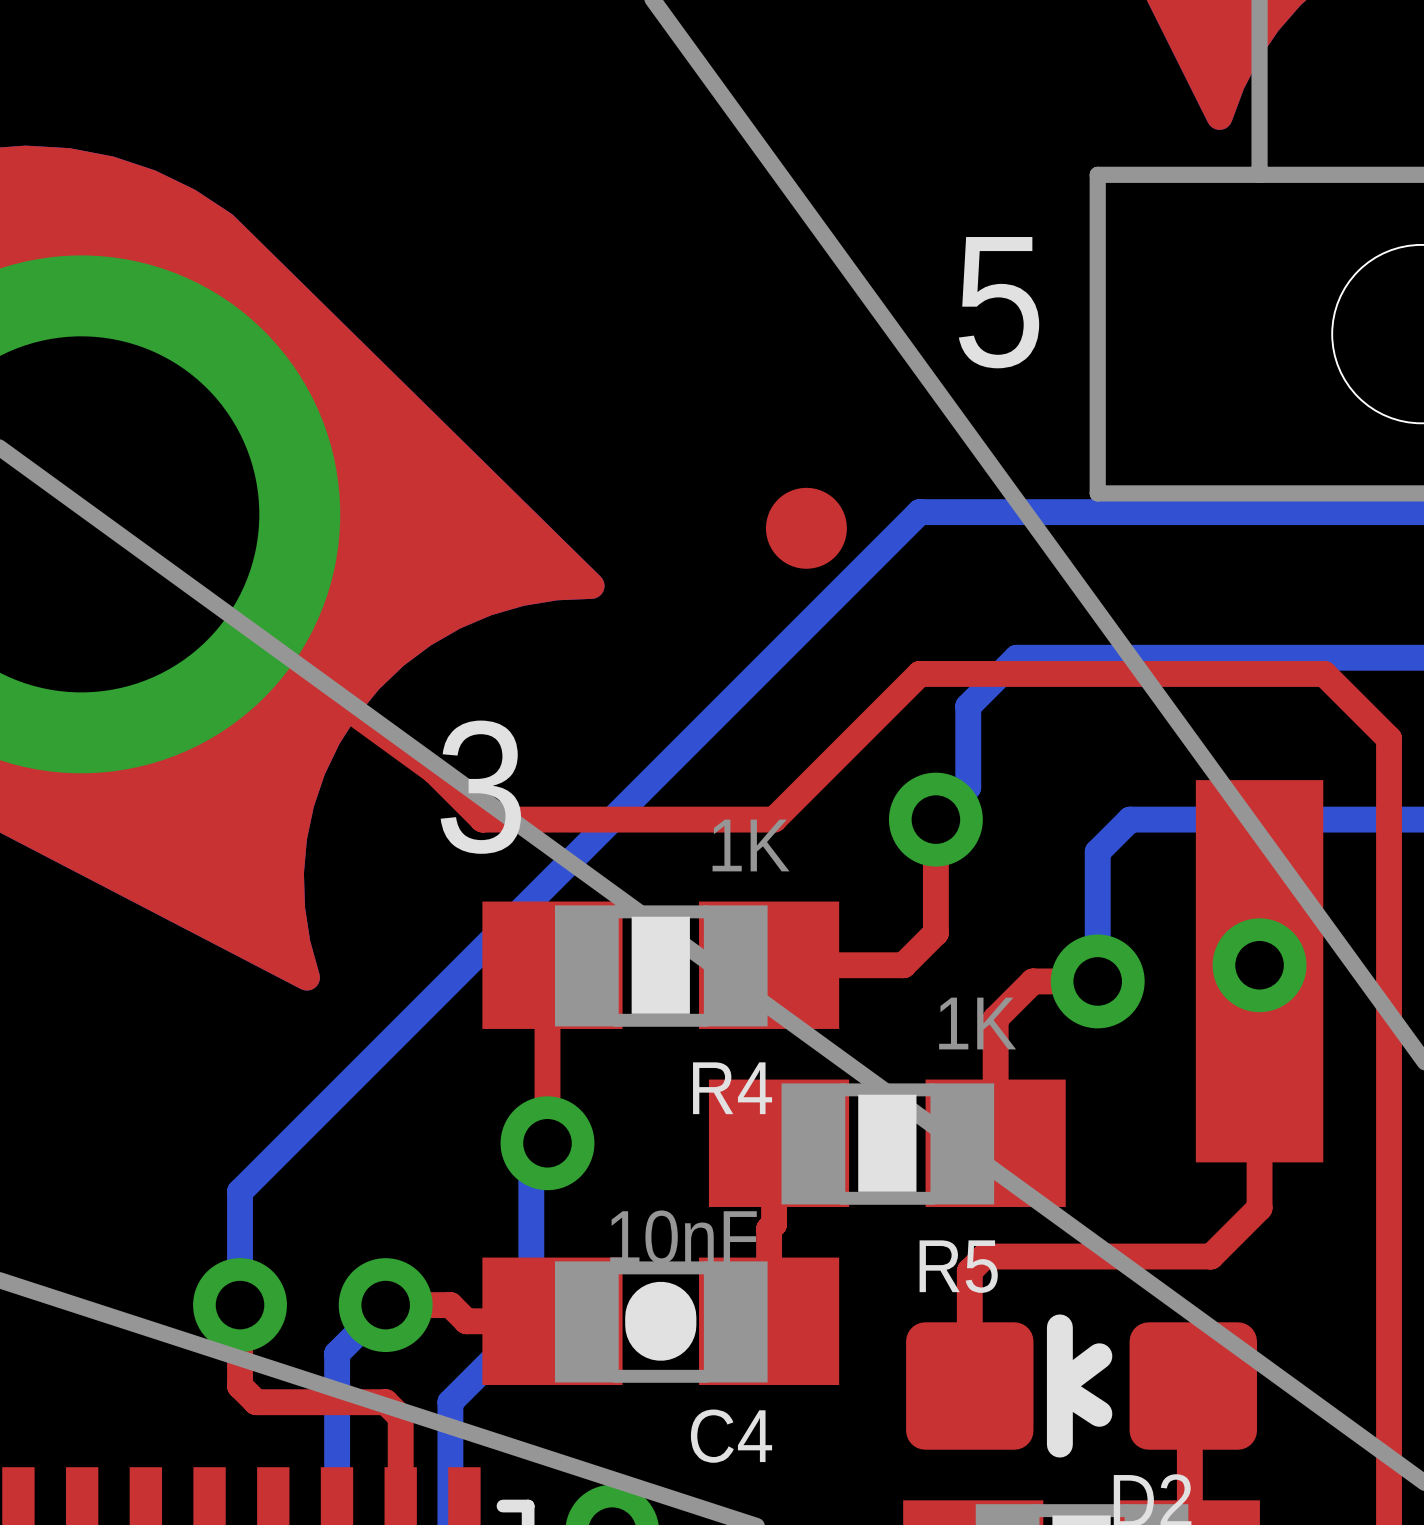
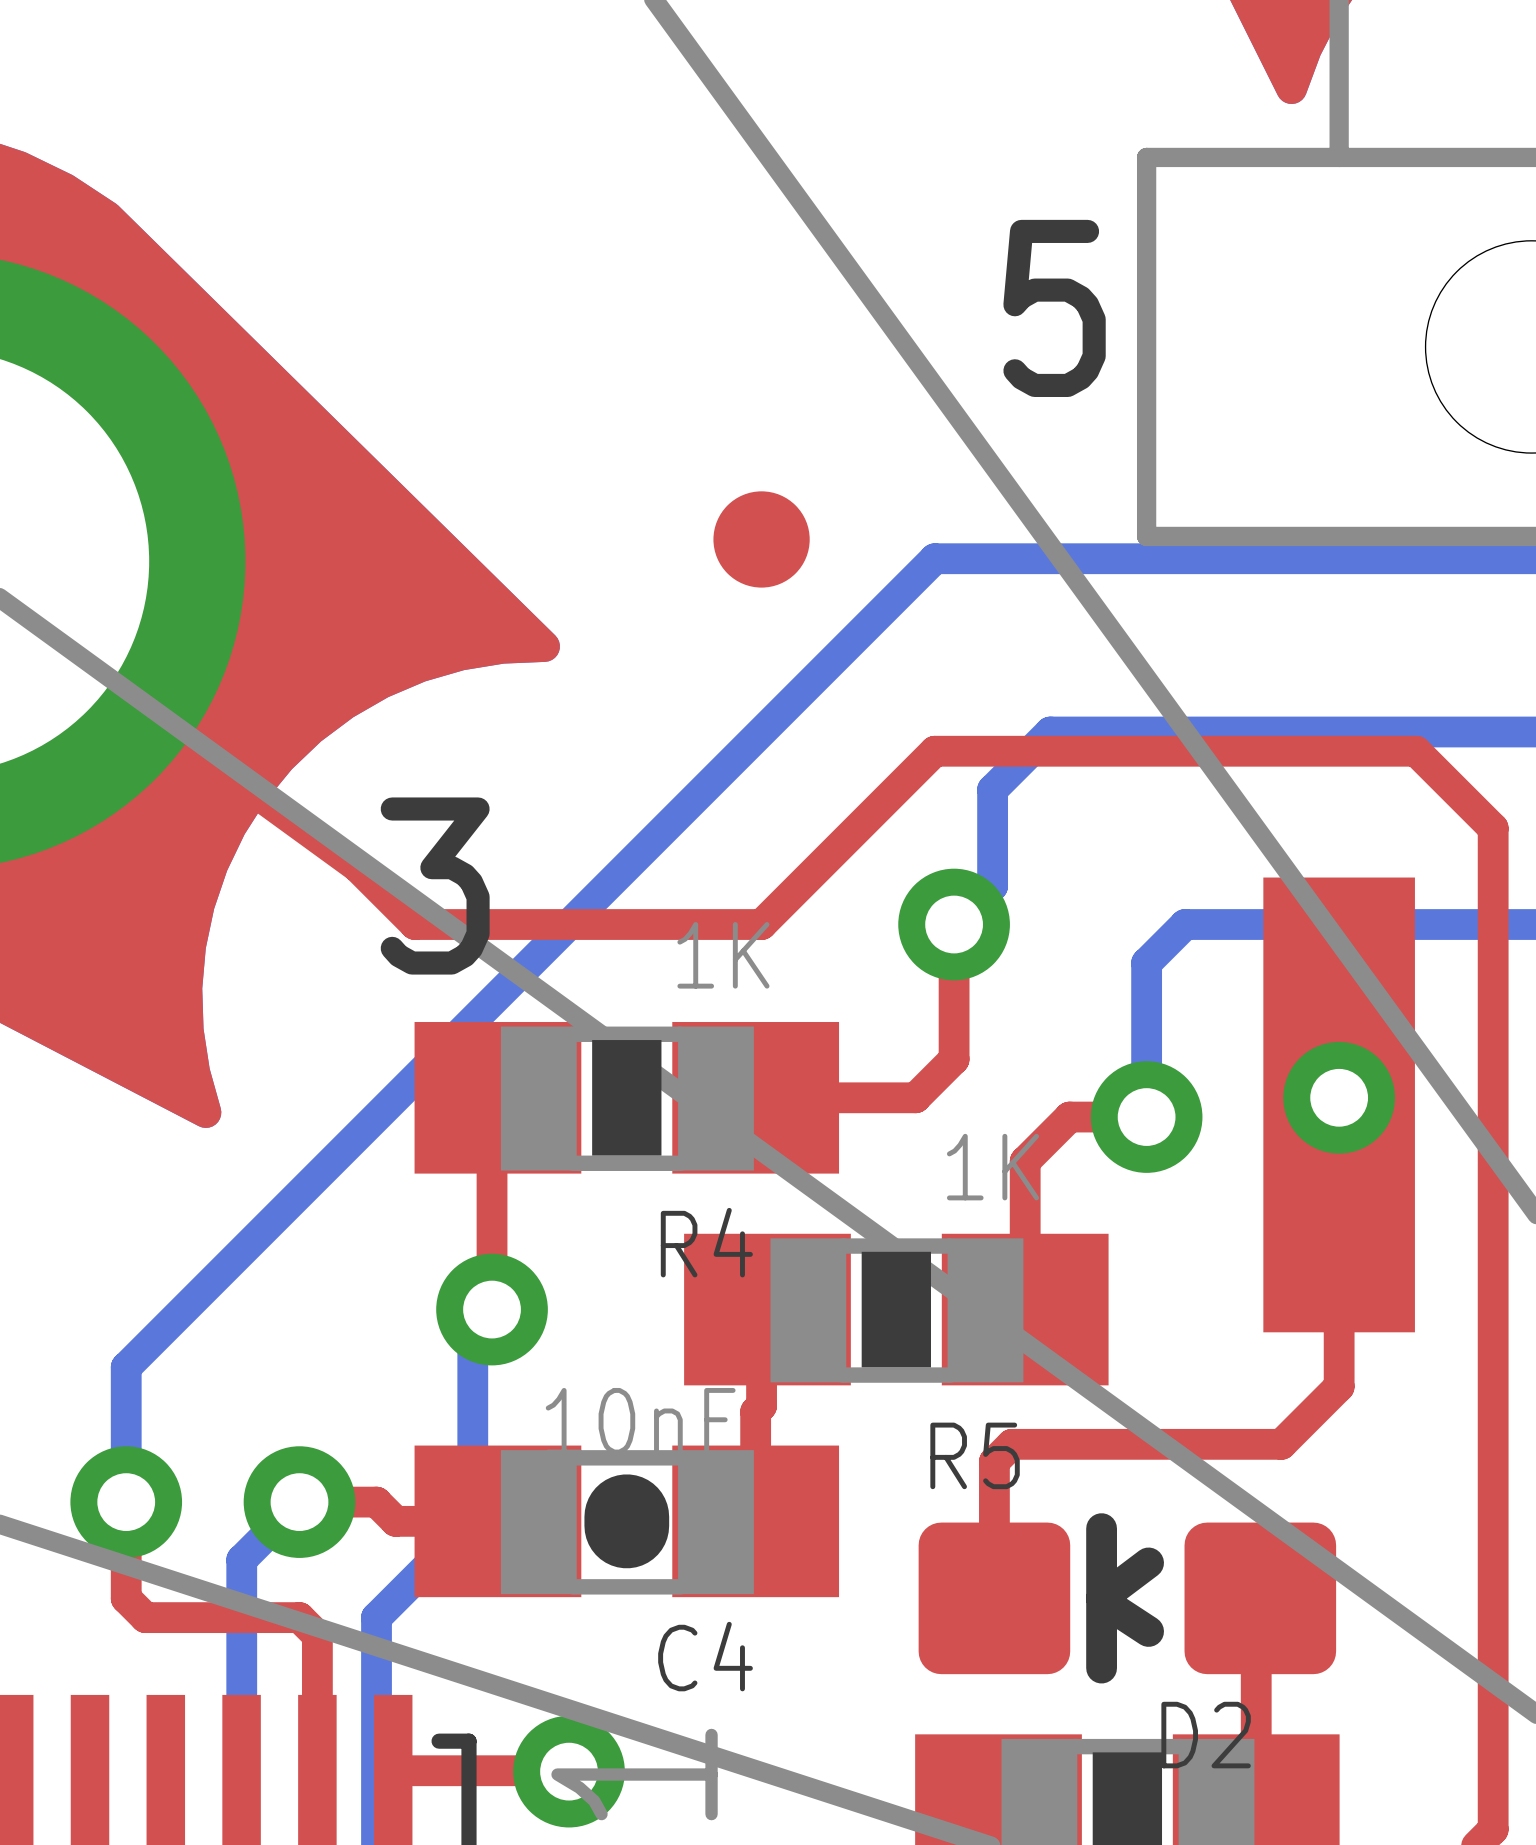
part position: (806, 528) -> (761, 539)

